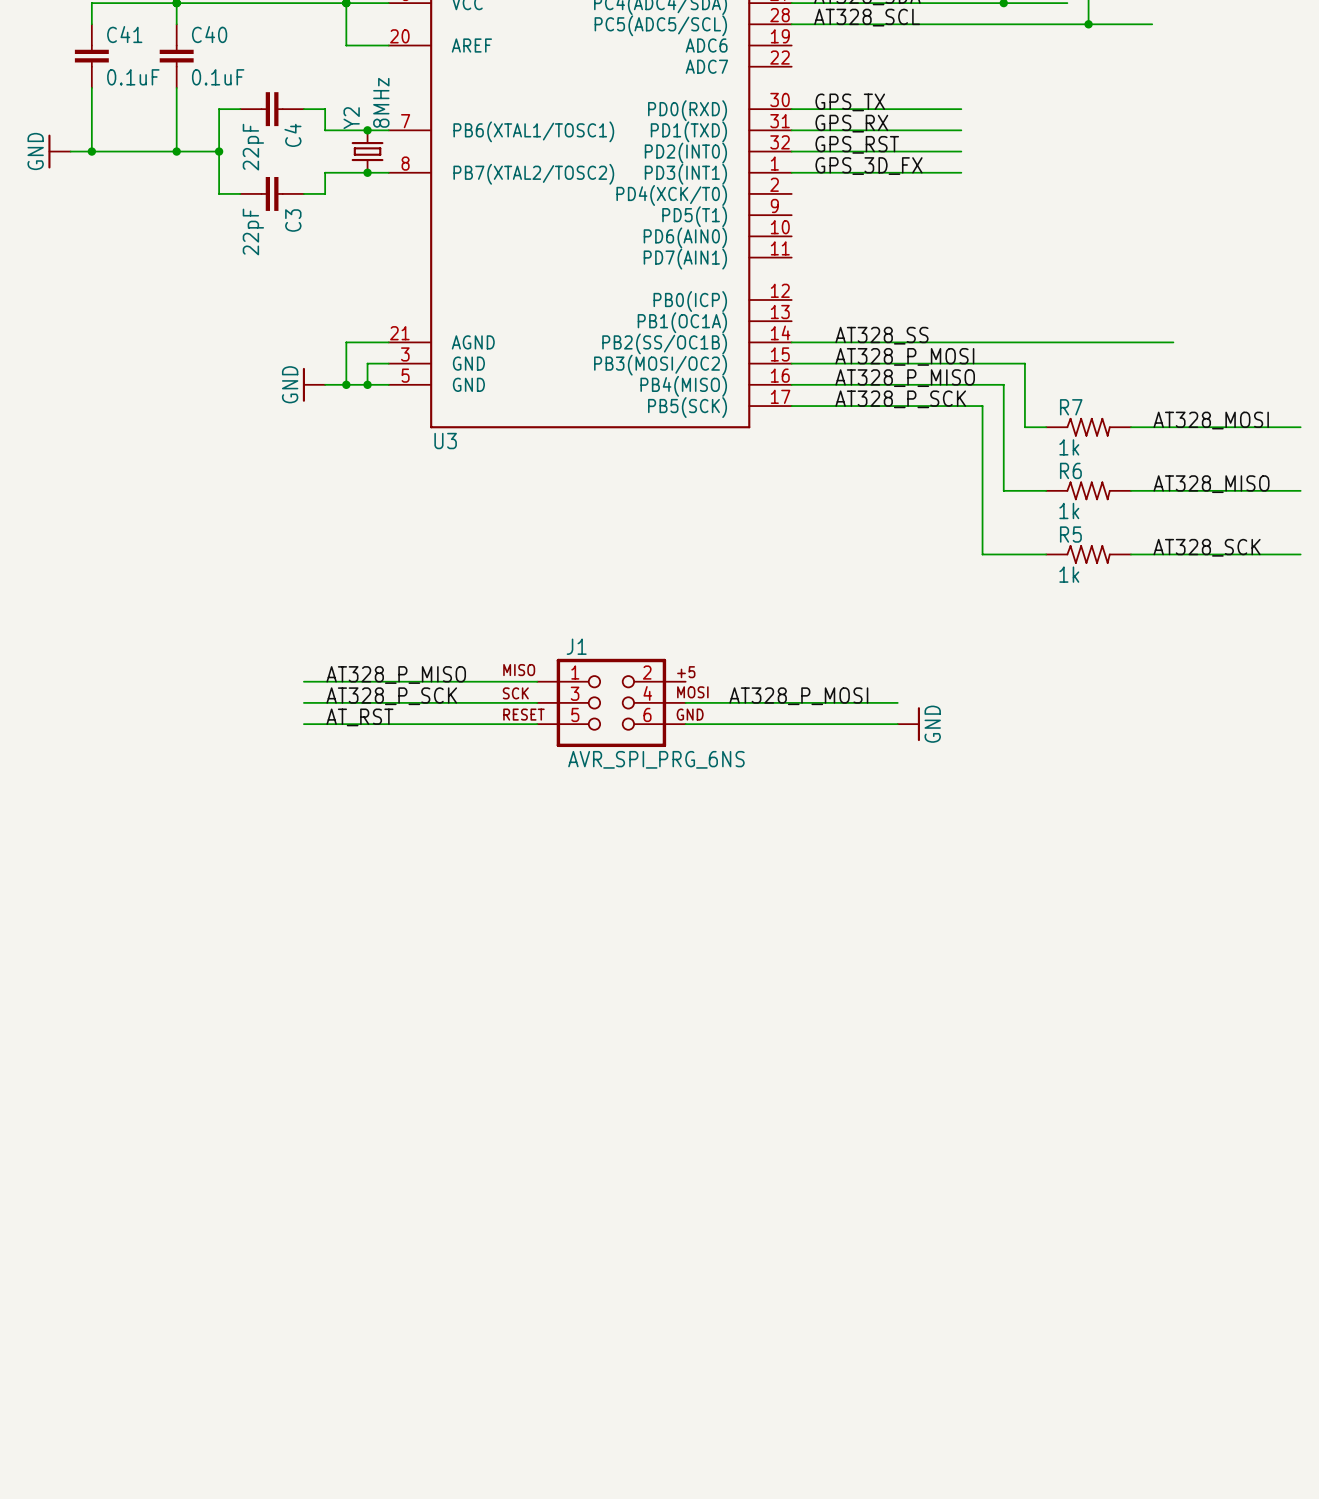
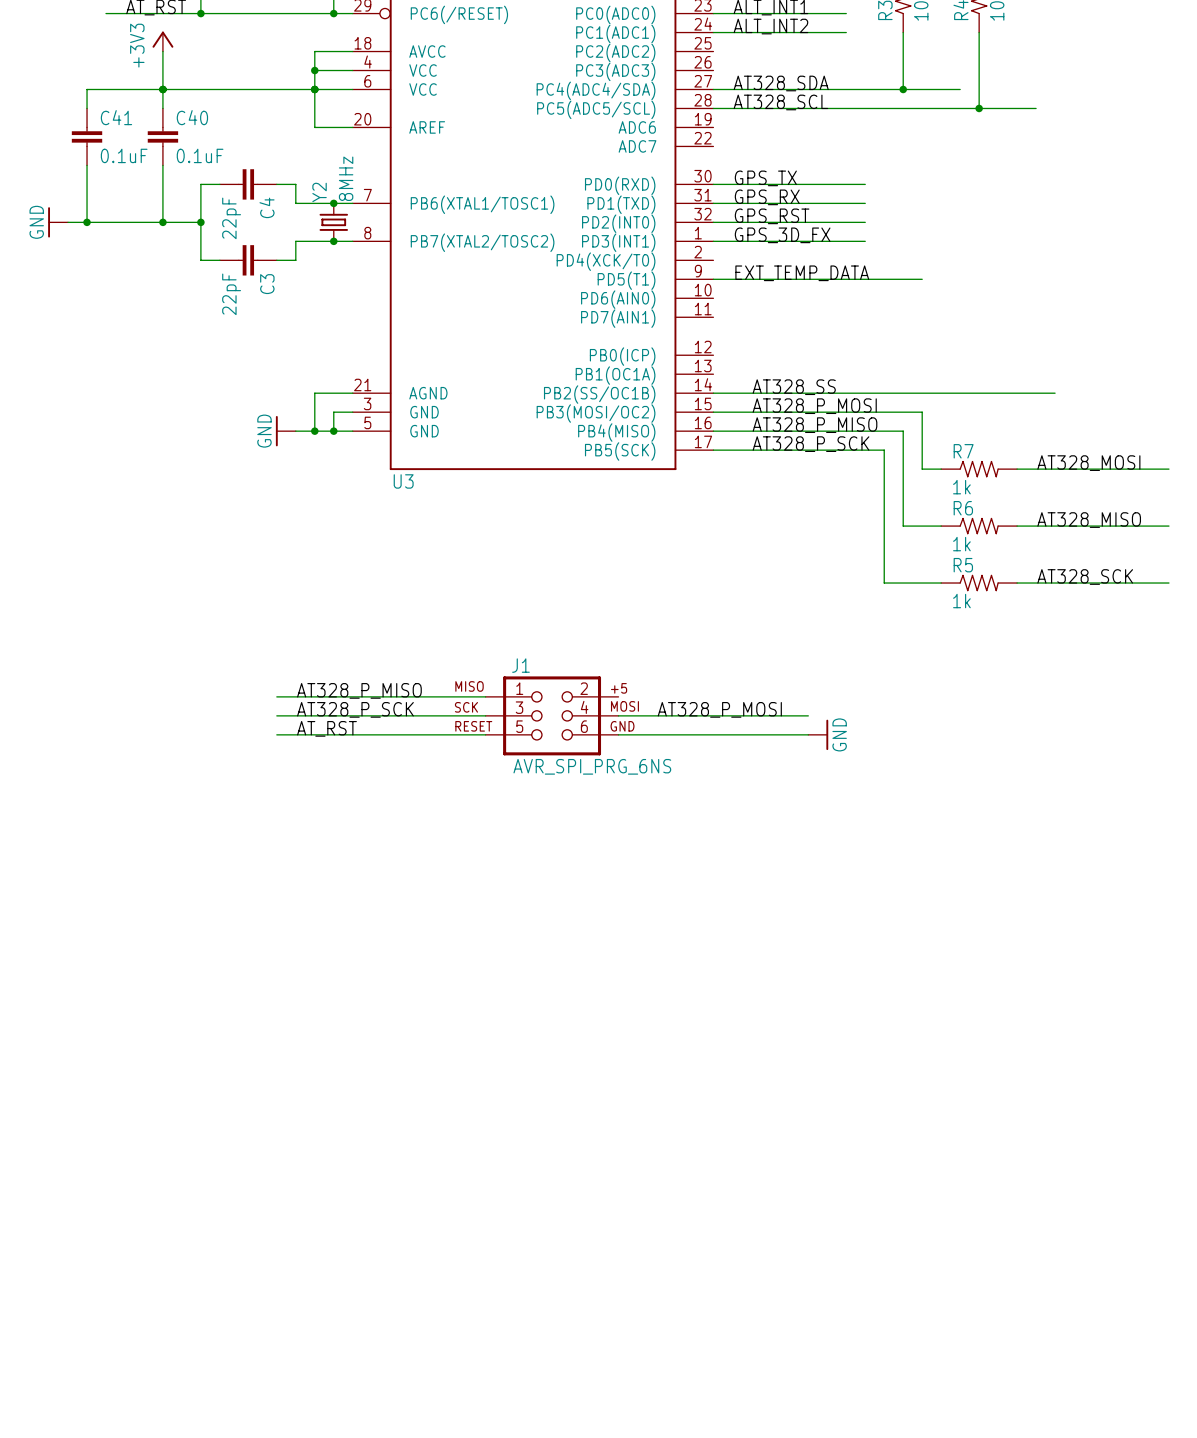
label: none -> EXT_TEMP_DATA (802, 273)
wire: none -> (713, 279) (922, 279)

